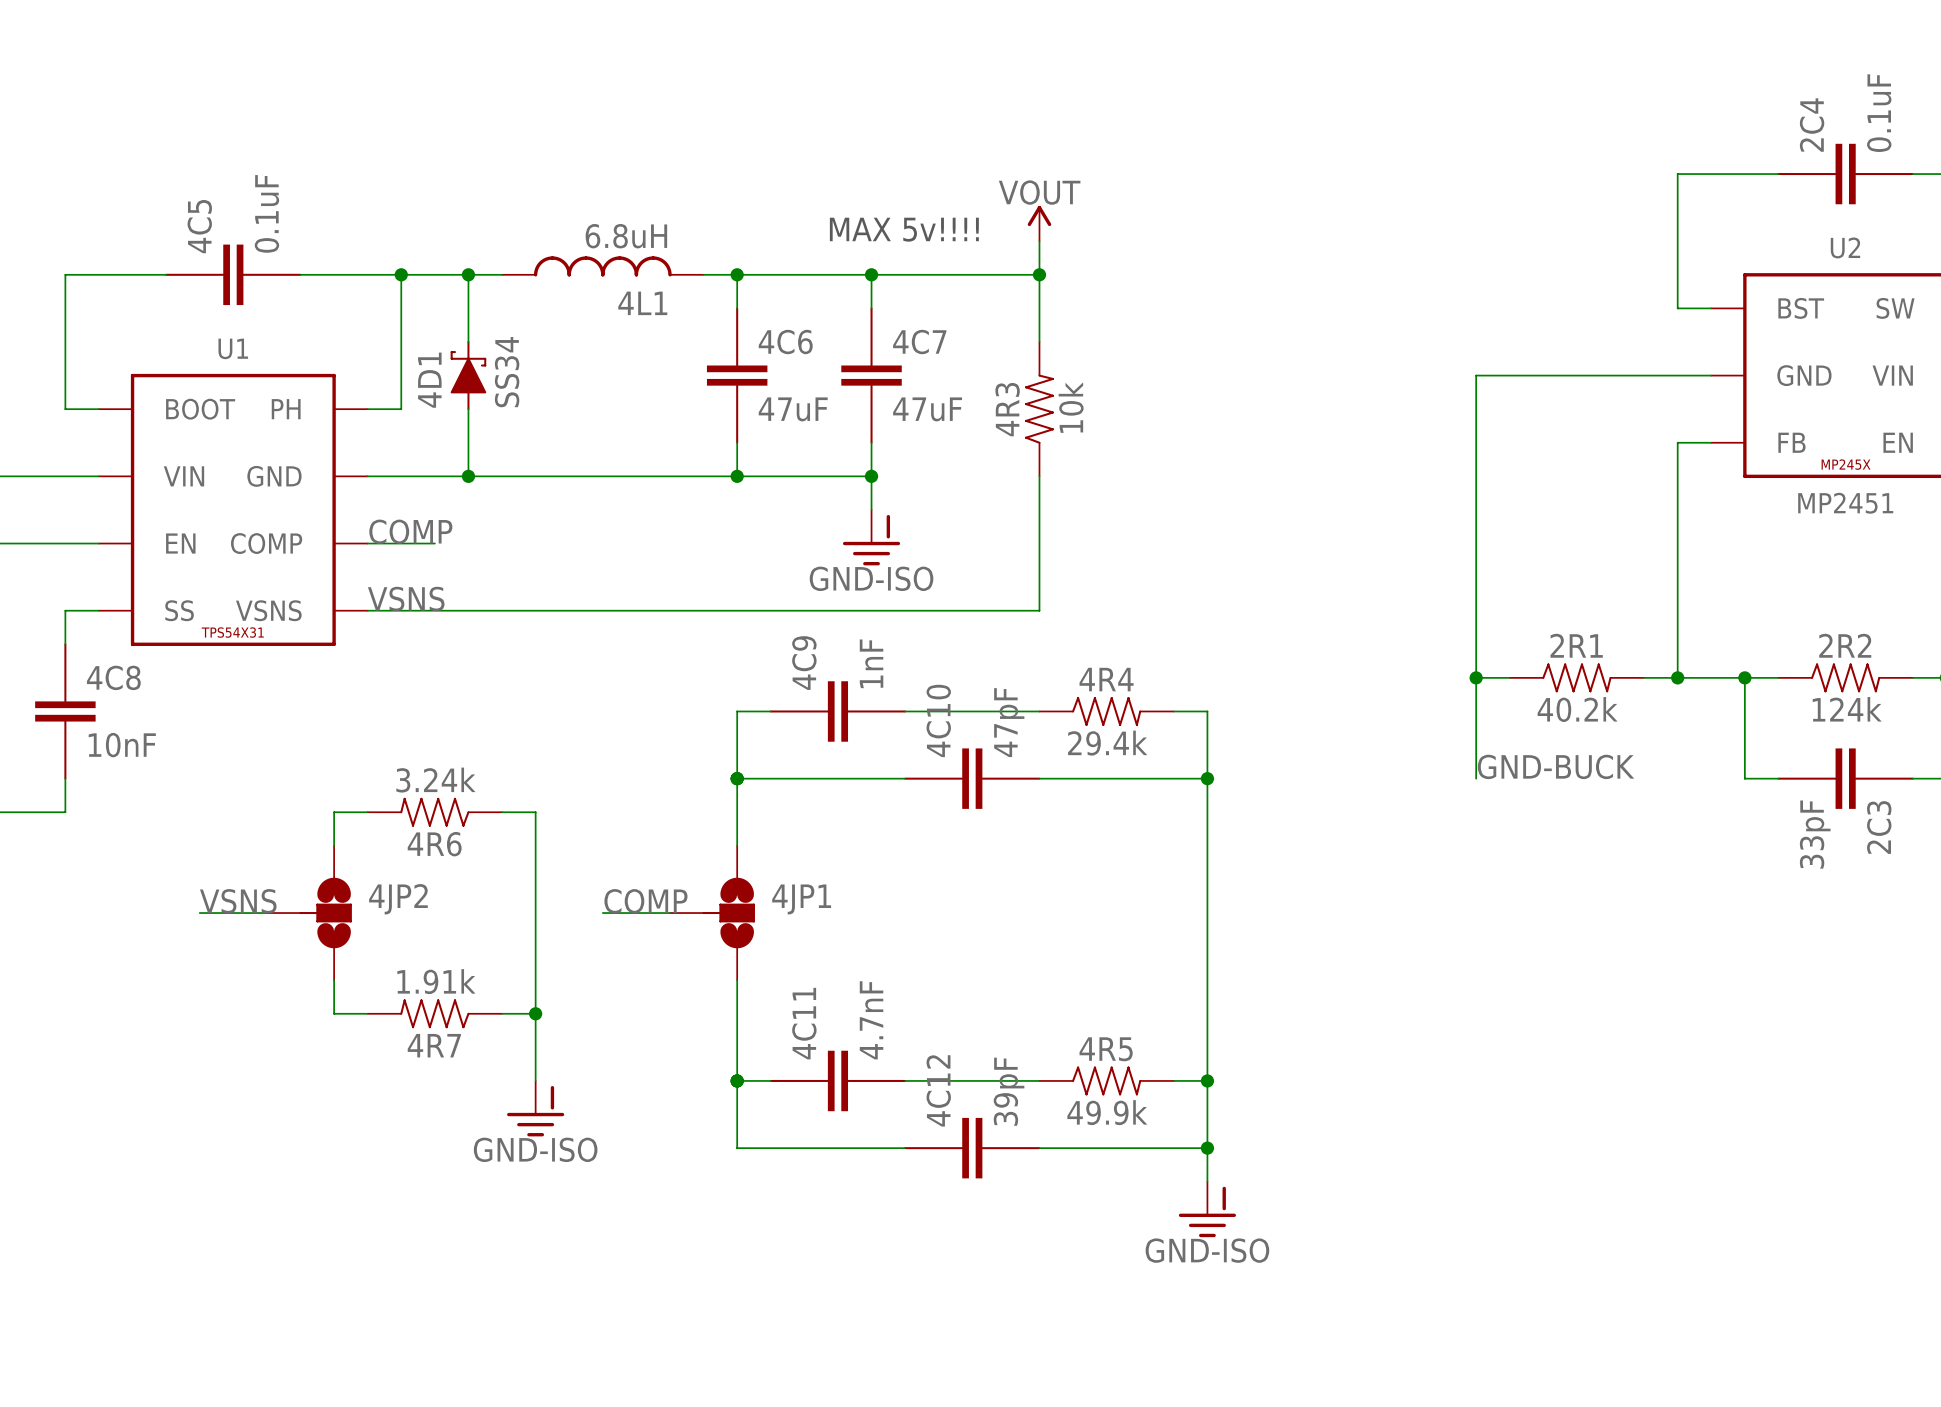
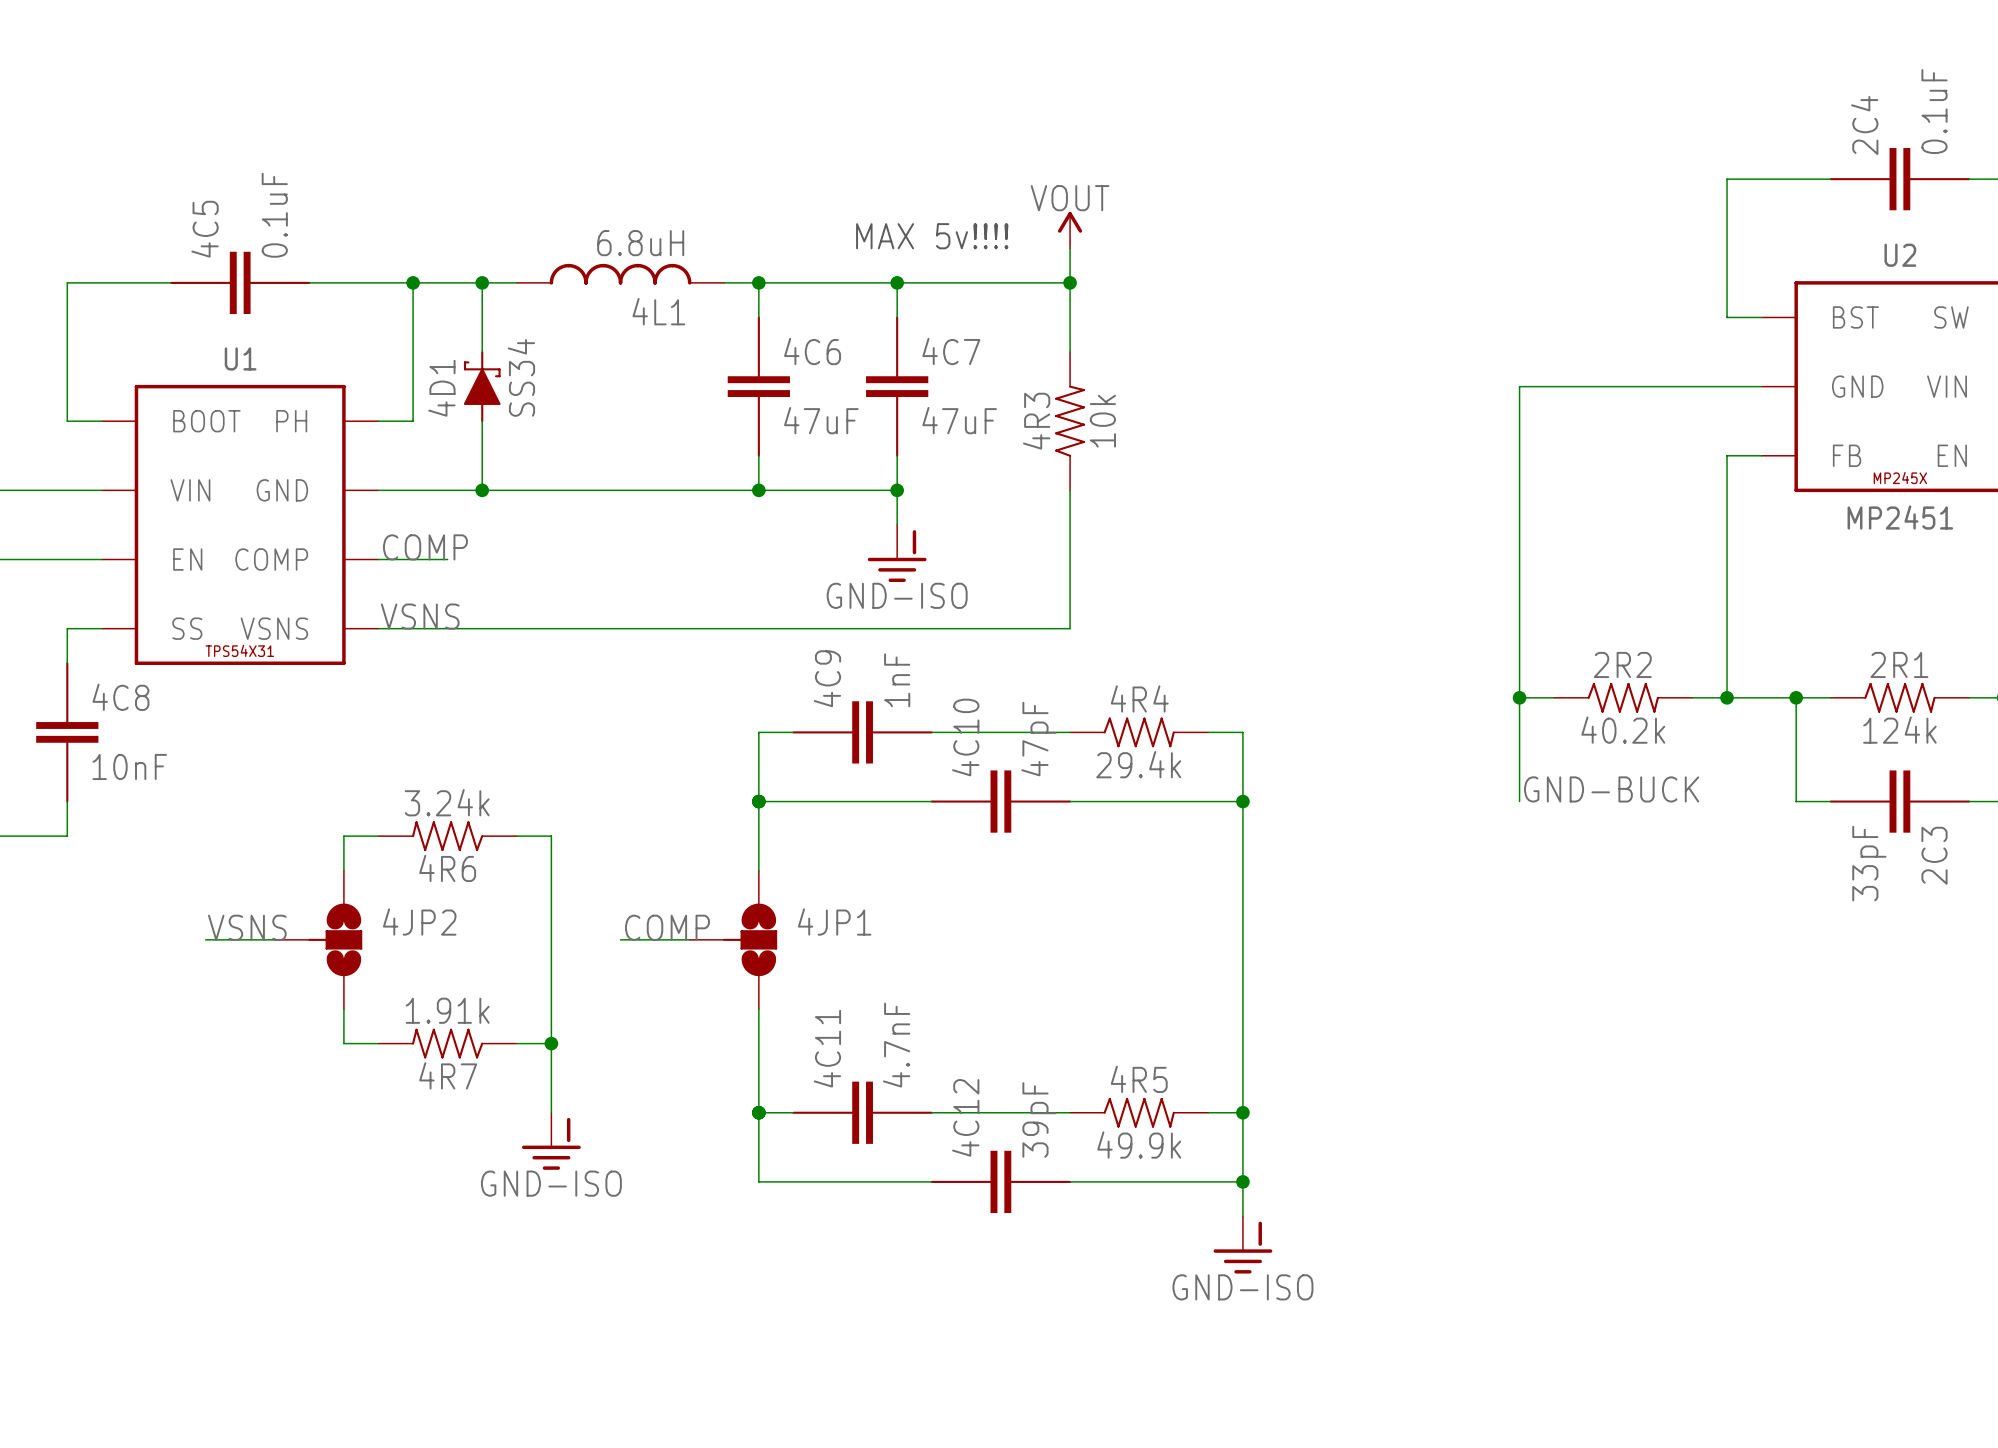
2R1 name: 2R1 (1576, 645) -> 2R2 (1622, 664)
2R2 name: 2R2 (1845, 645) -> 2R1 (1899, 664)

